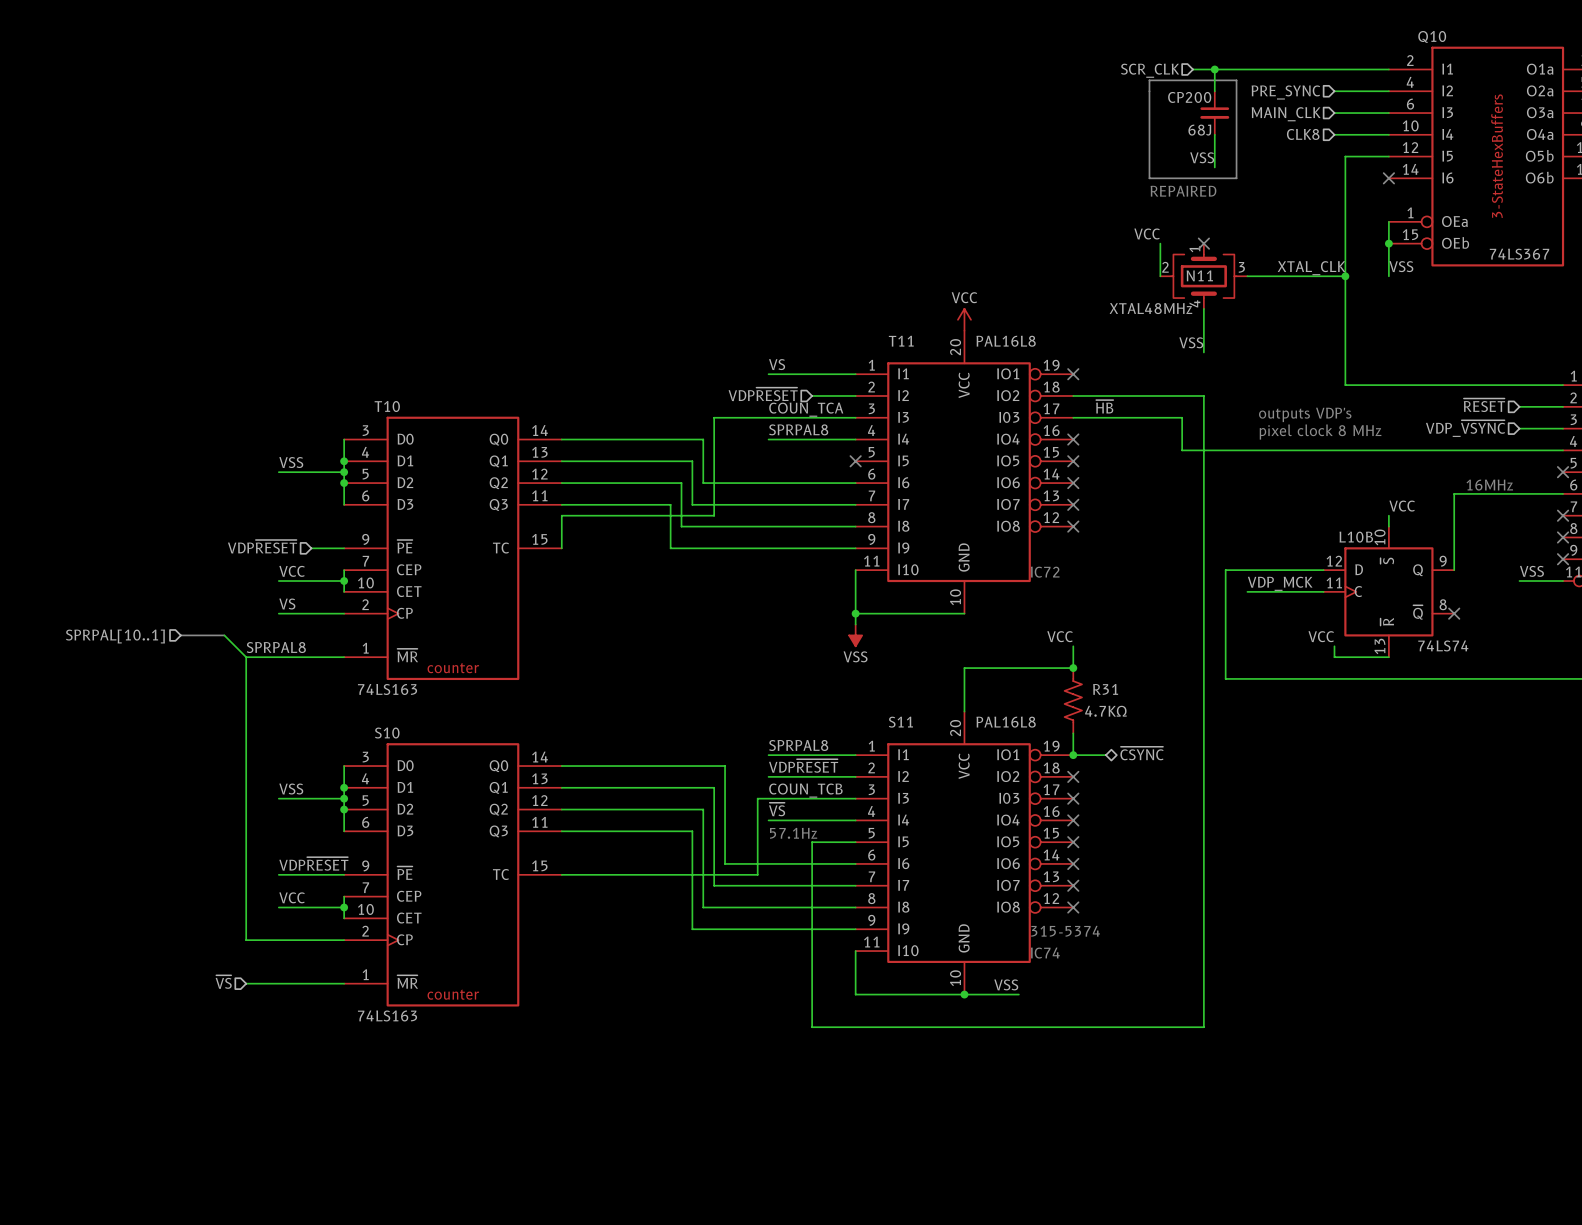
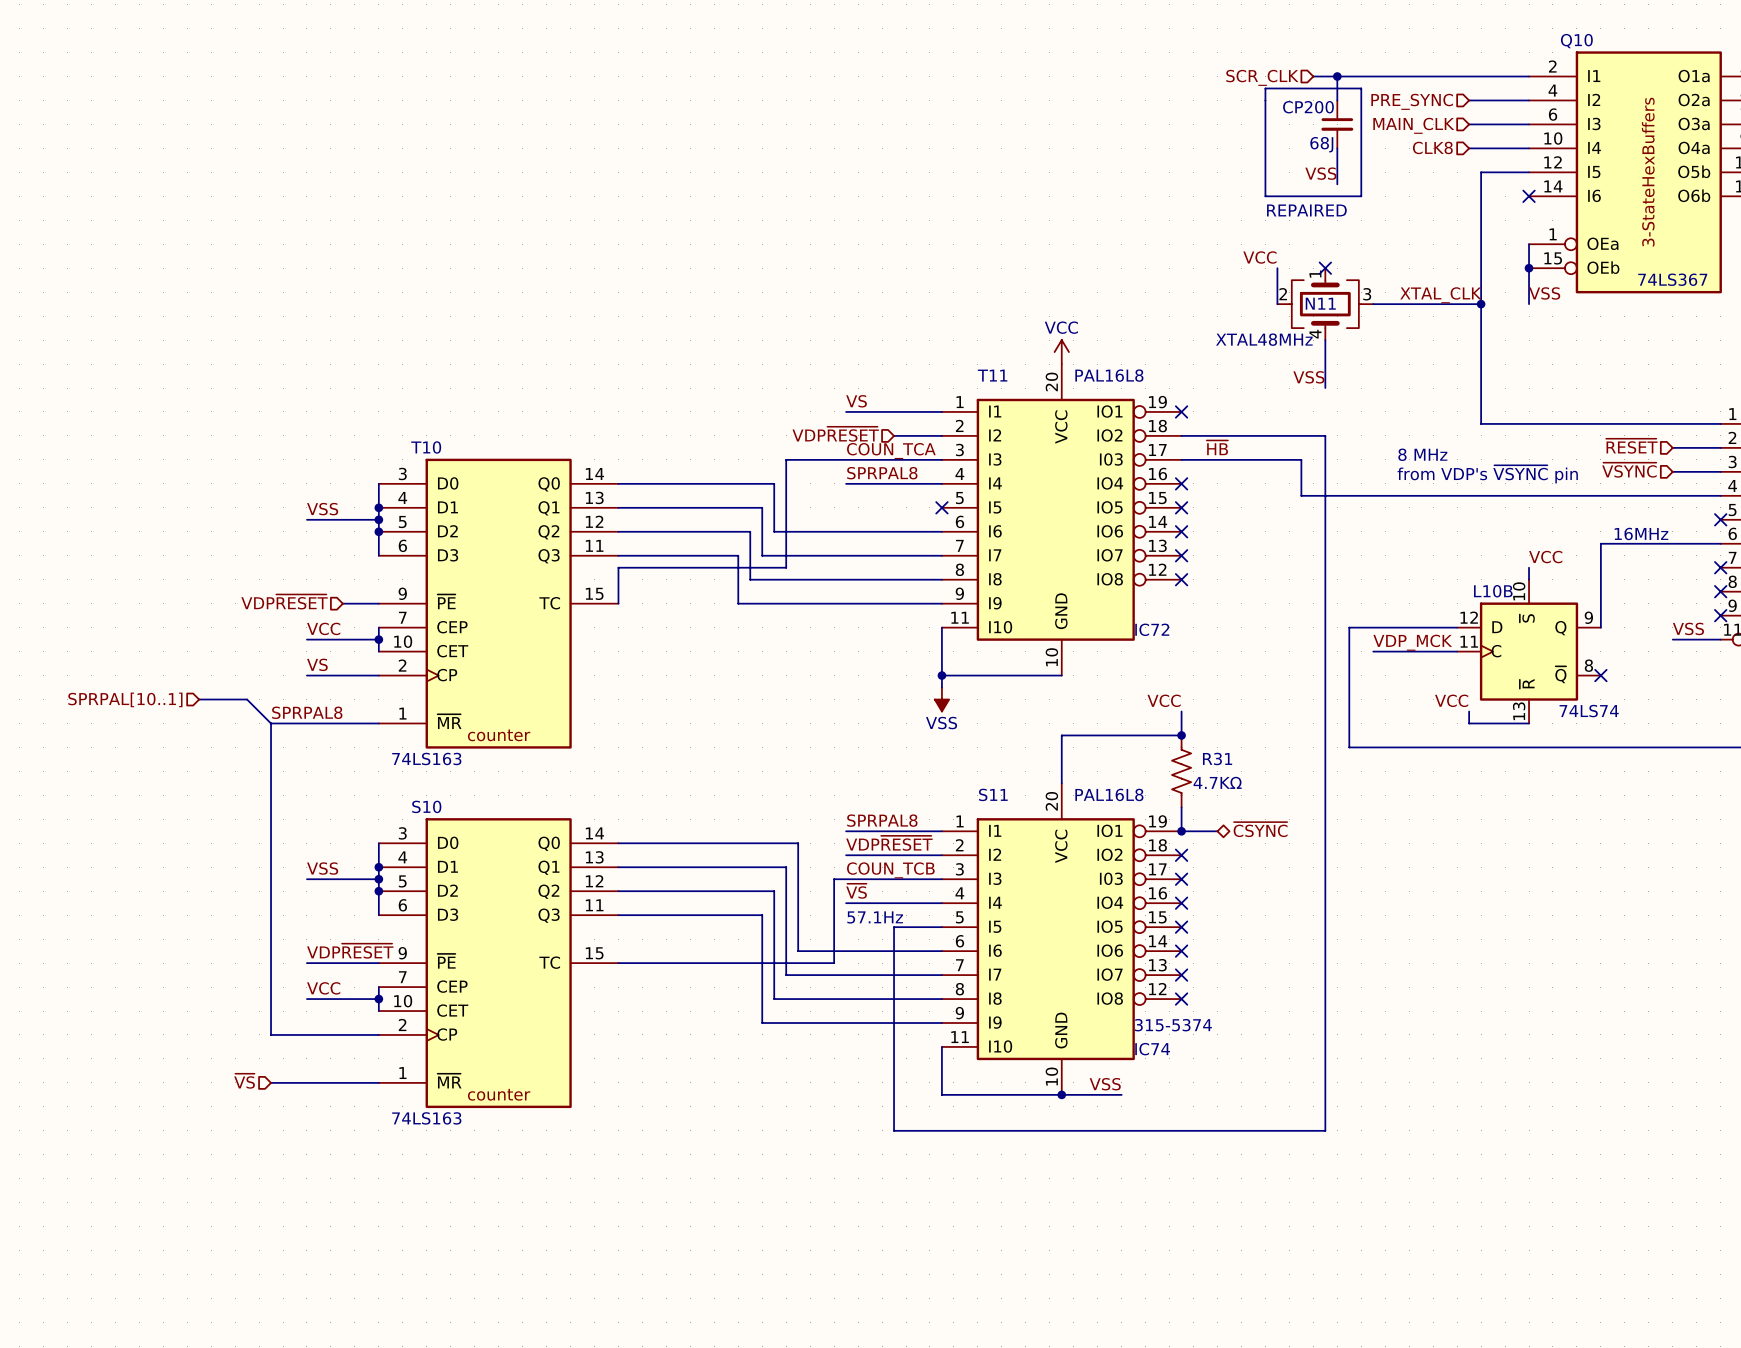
text: none -> 8 MHz (1422, 454)
text: outputs VDP's (1305, 414) -> none
hierarchical label: VDP_~{VSYNC} (1465, 428) -> ~{VSYNC} (1629, 470)
text: none -> from VDP's ~{VSYNC} pin (1487, 474)
text: pixel clock 8 MHz (1320, 432) -> none

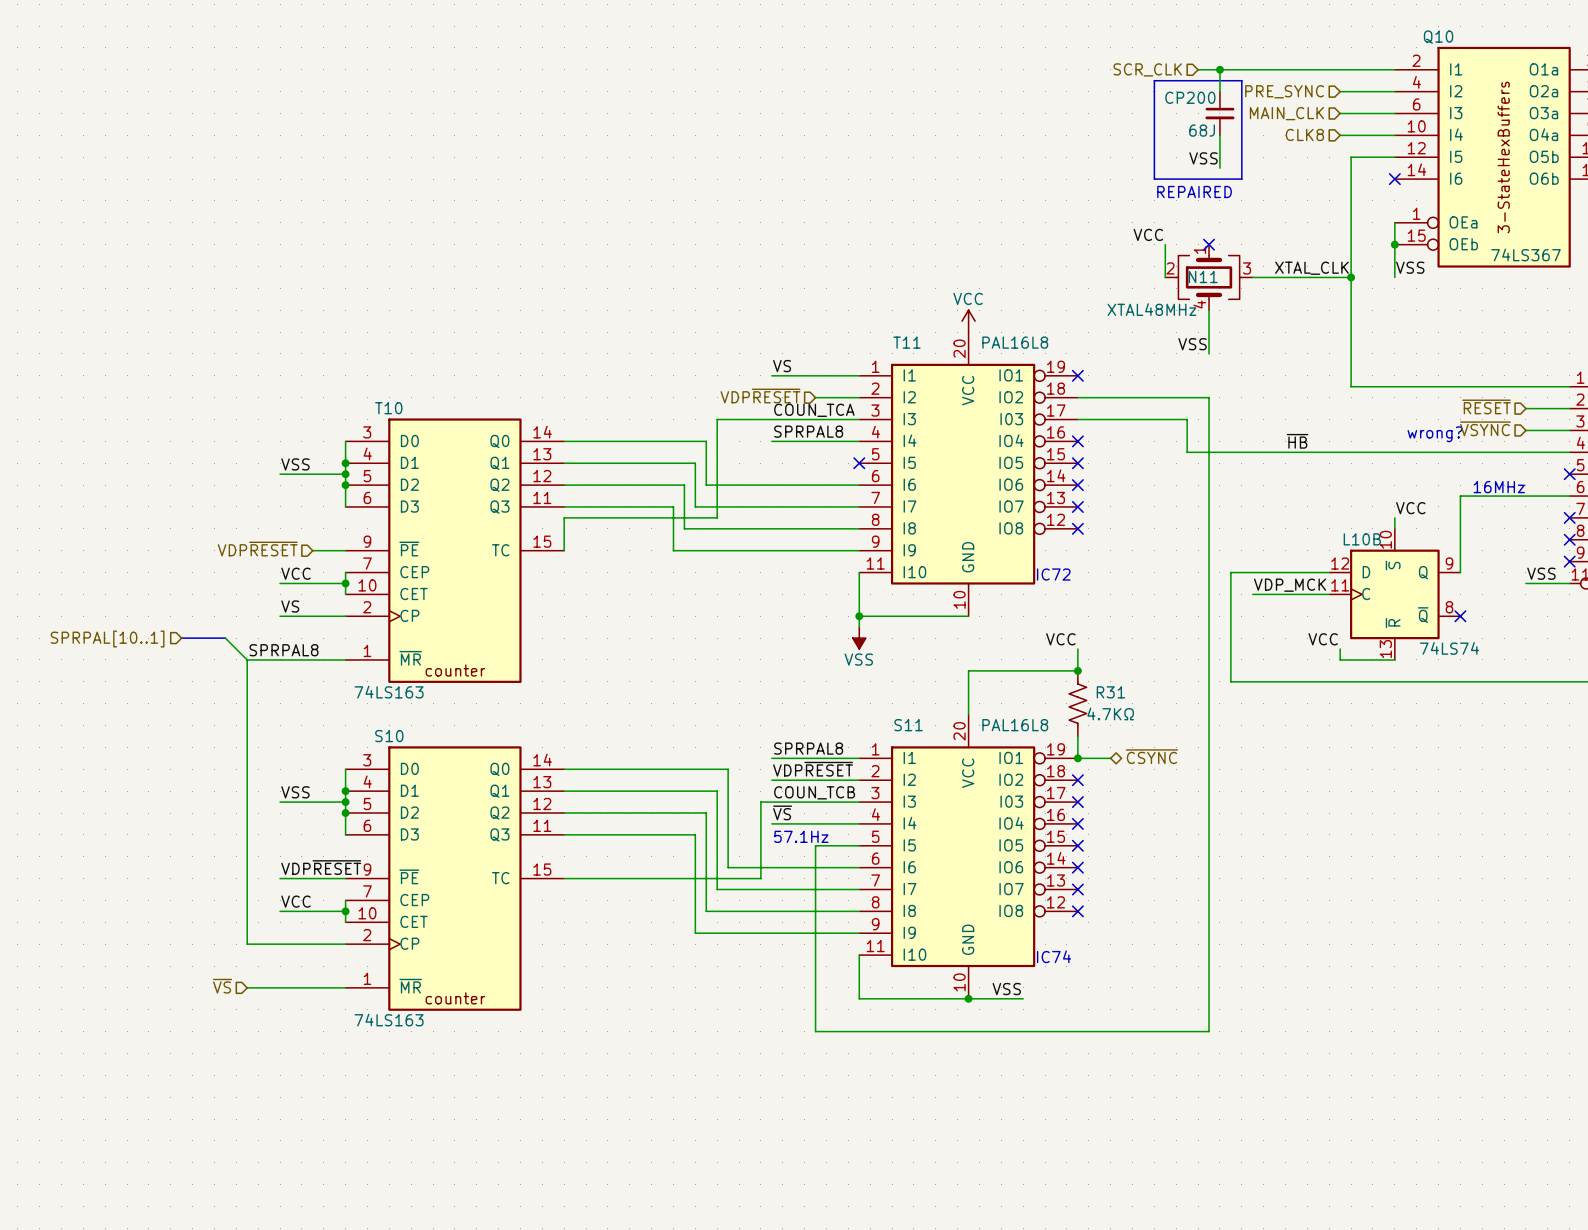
label position: ~{HB} (1217, 447) -> ~{HB} (1297, 441)
text: 8 MHz (1422, 454) -> none
text: from VDP's ~{VSYNC} pin (1487, 474) -> none
text: none -> wrong? (1434, 434)
text: 315-5374 (1173, 1025) -> none

